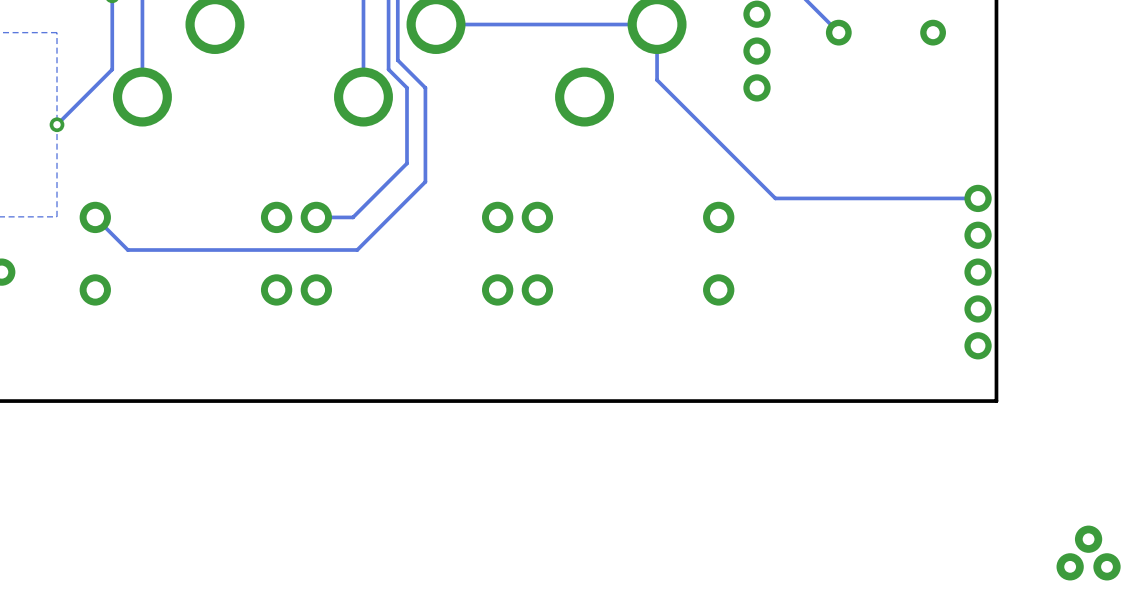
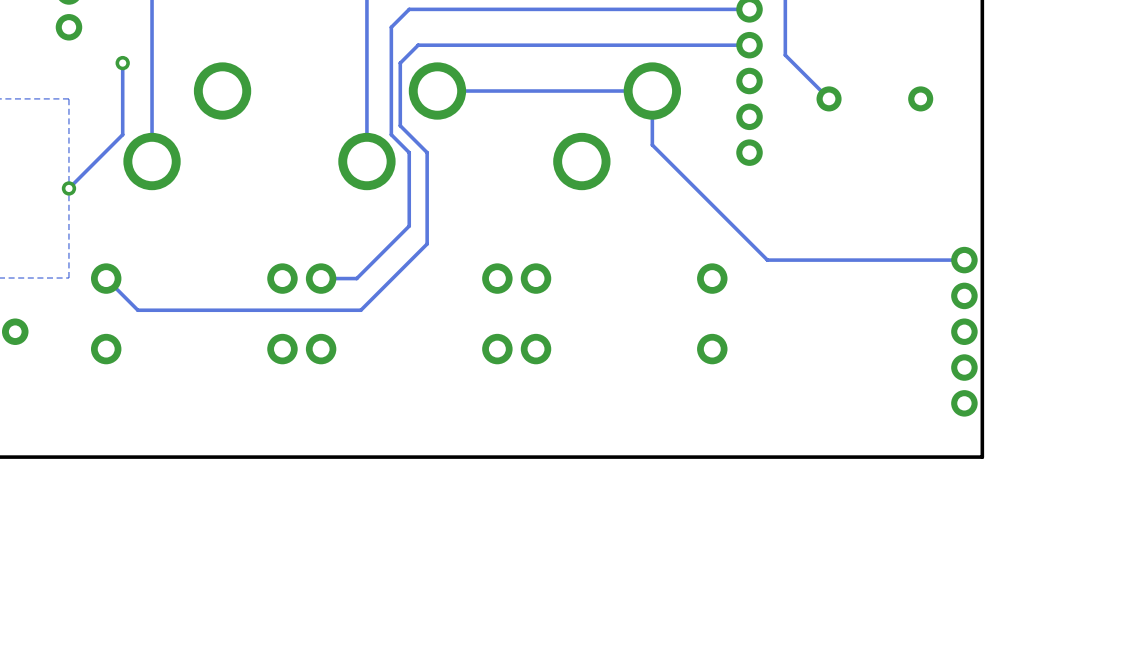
part: (1088, 553) -> none

